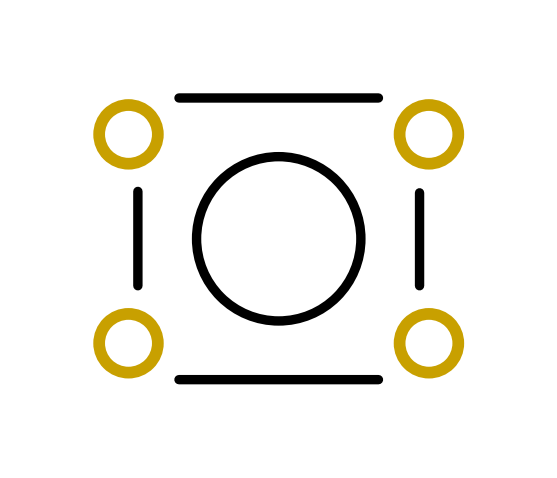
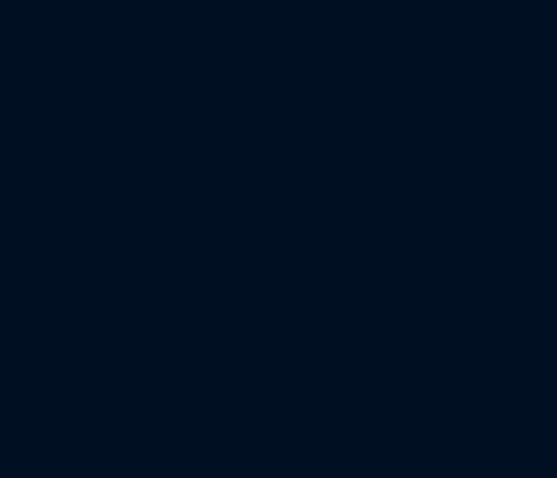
part: (278, 238) -> none

